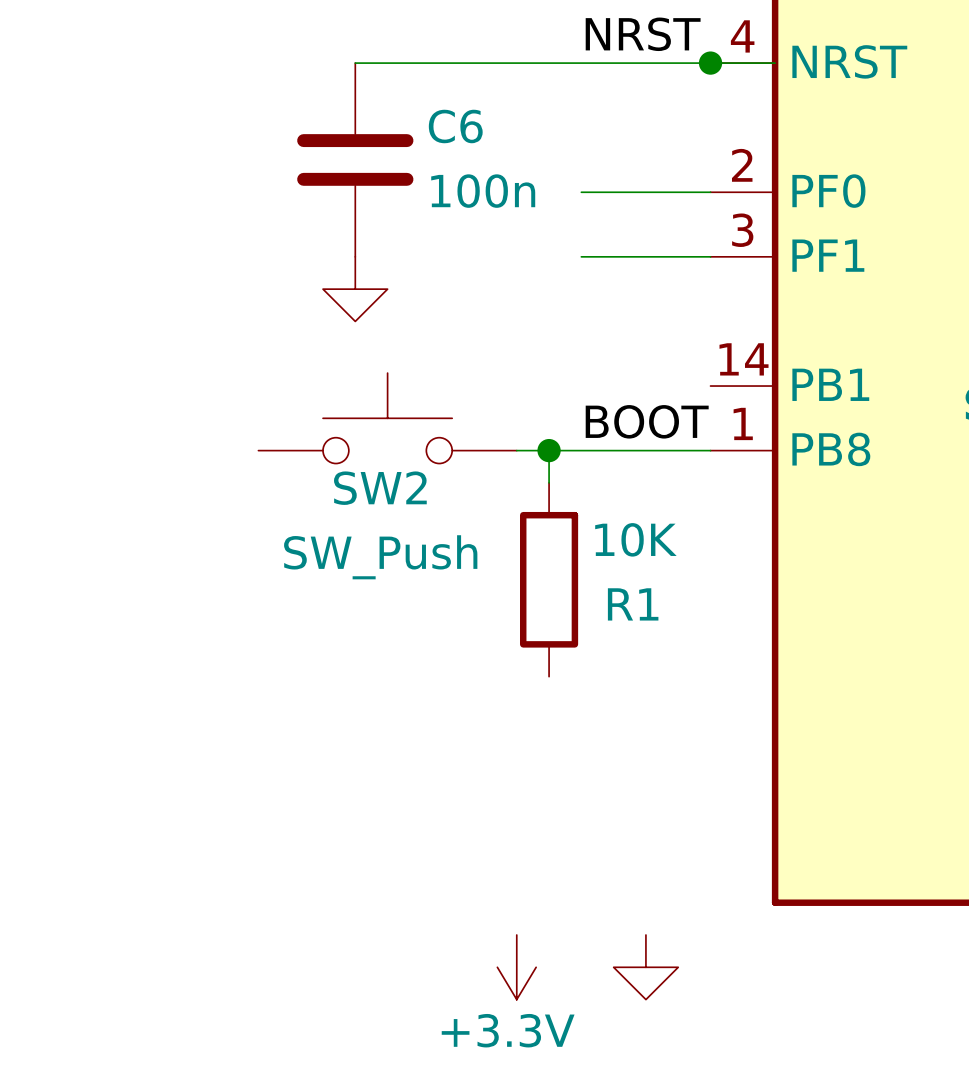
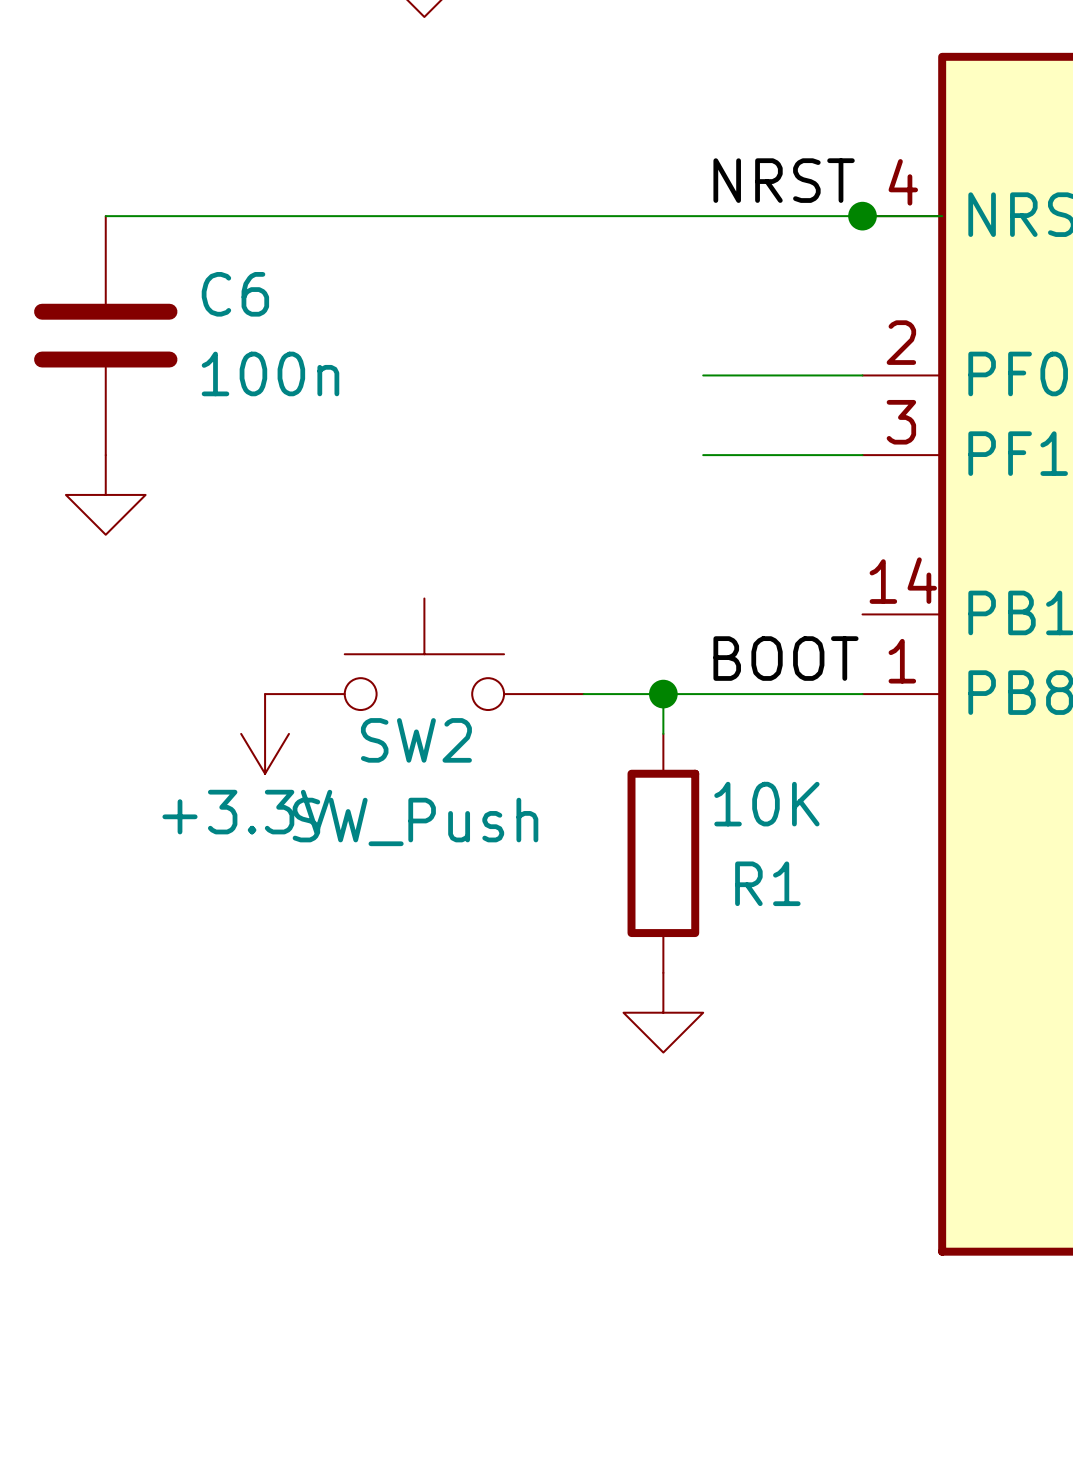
wire: none -> (105, 216) (424, 216)
C6 position: (355, 159) -> (105, 335)
power symbol: none -> (105, 494)
power symbol: (355, 289) -> none
SW2 position: (387, 418) -> (424, 654)
power symbol: none -> (663, 1012)
power symbol position: +3.3V (516, 967) -> +3.3V (265, 733)
power symbol: (645, 967) -> none

